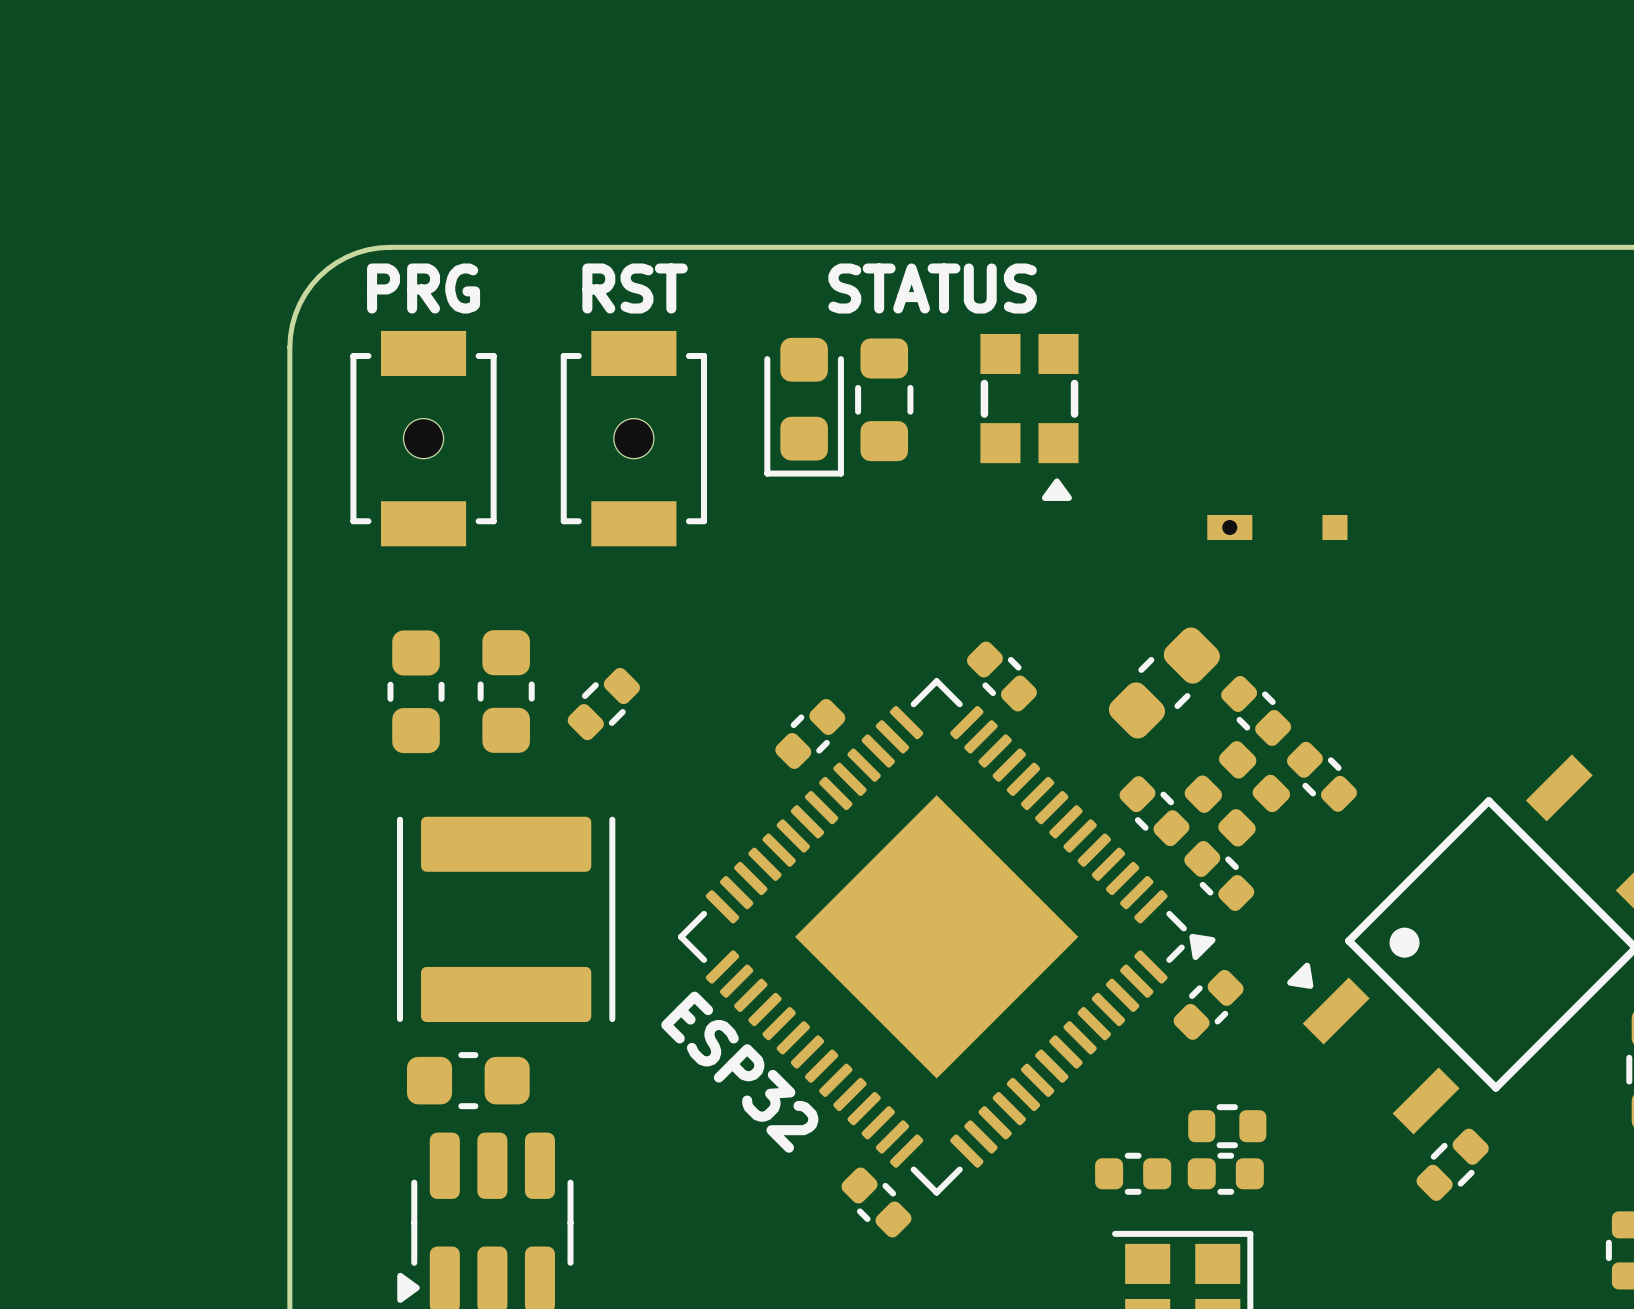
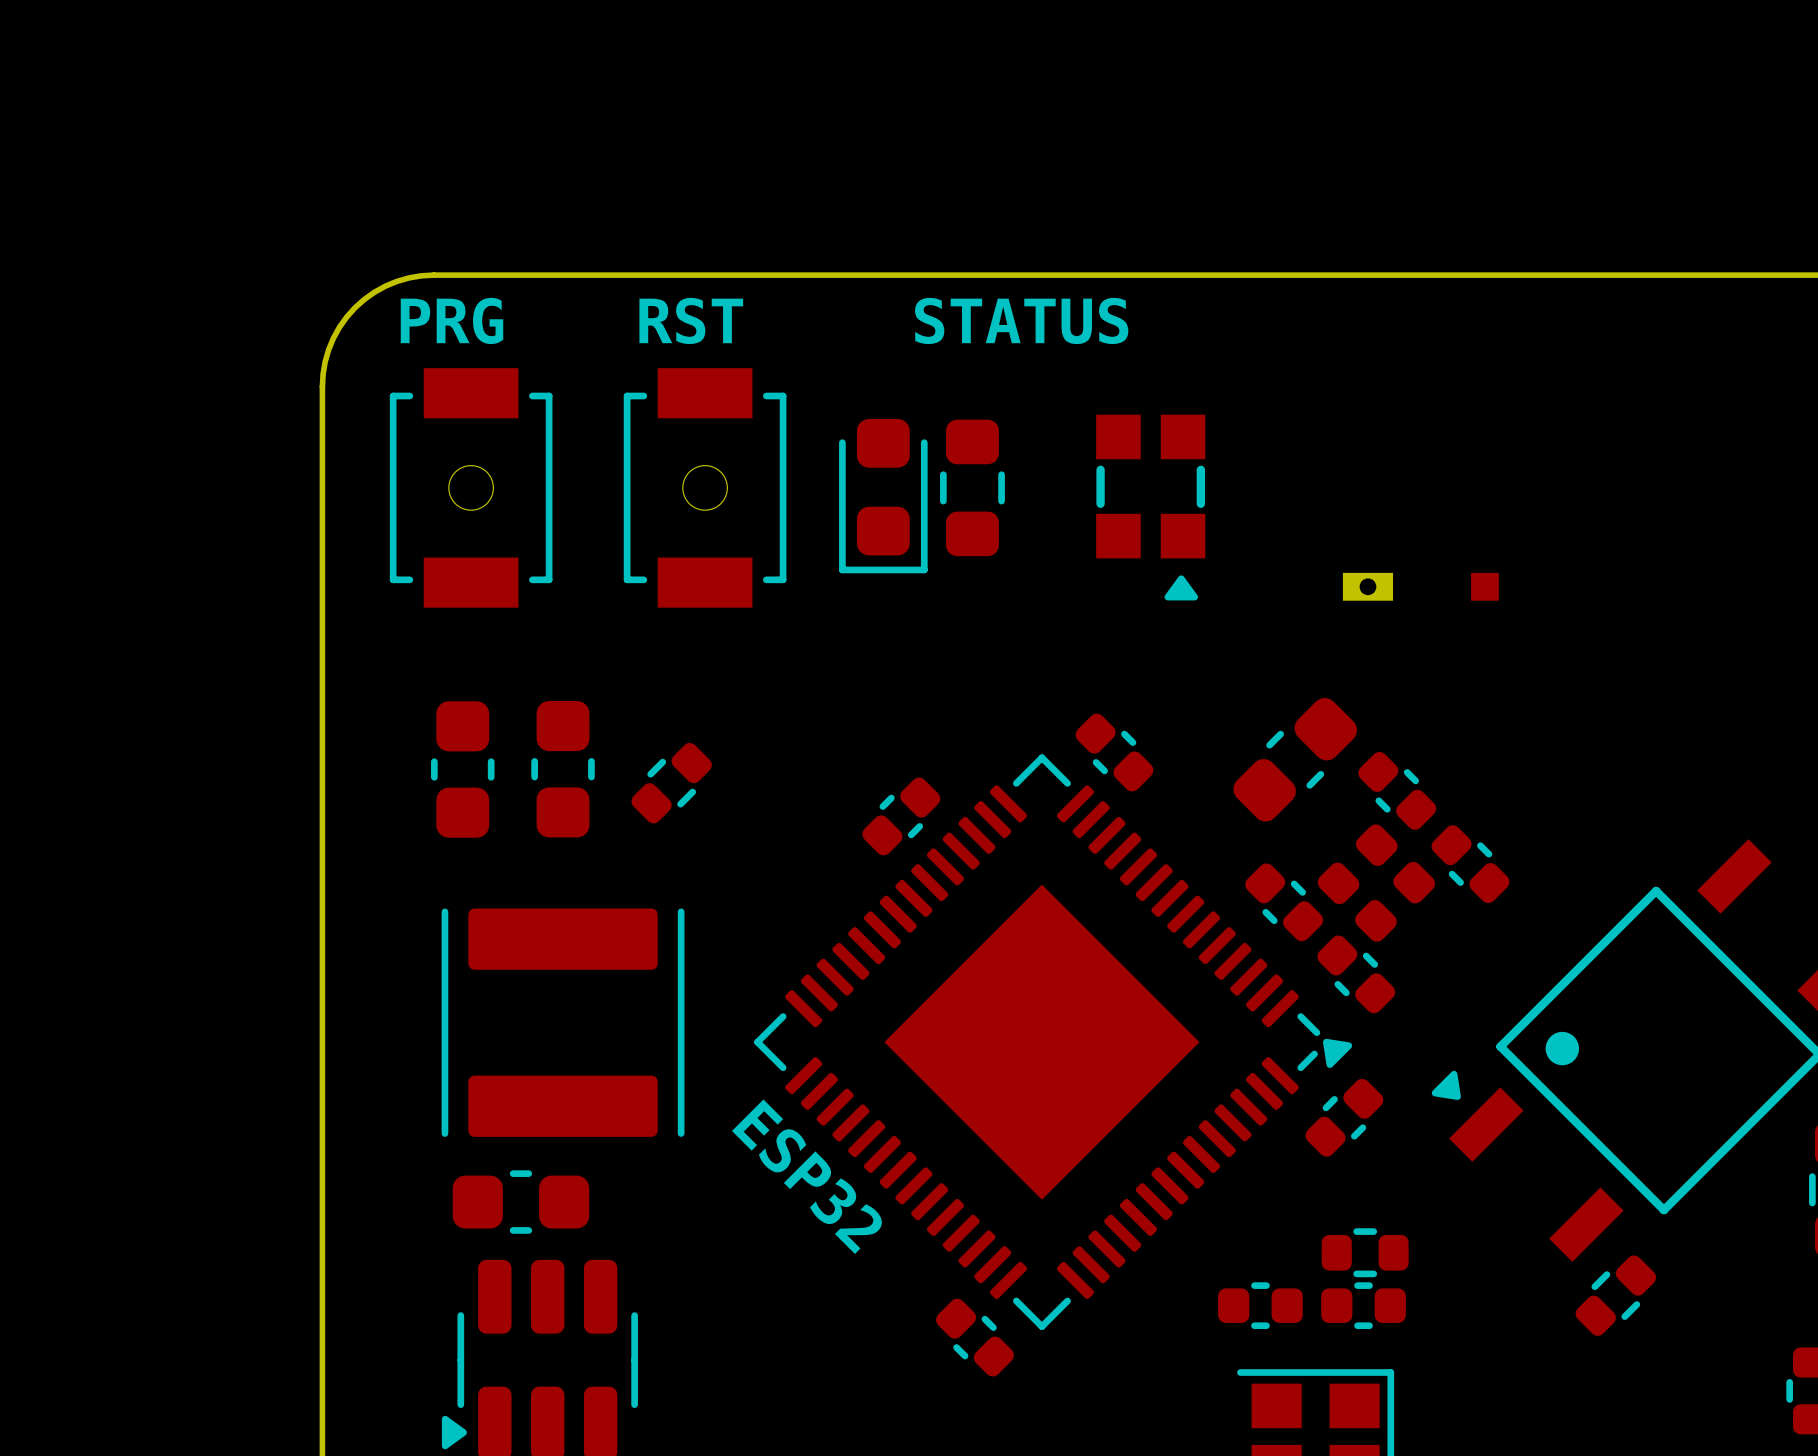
part position: (884, 399) -> (972, 487)
part position: (804, 407) -> (883, 496)
part position: (1029, 417) -> (1150, 507)

